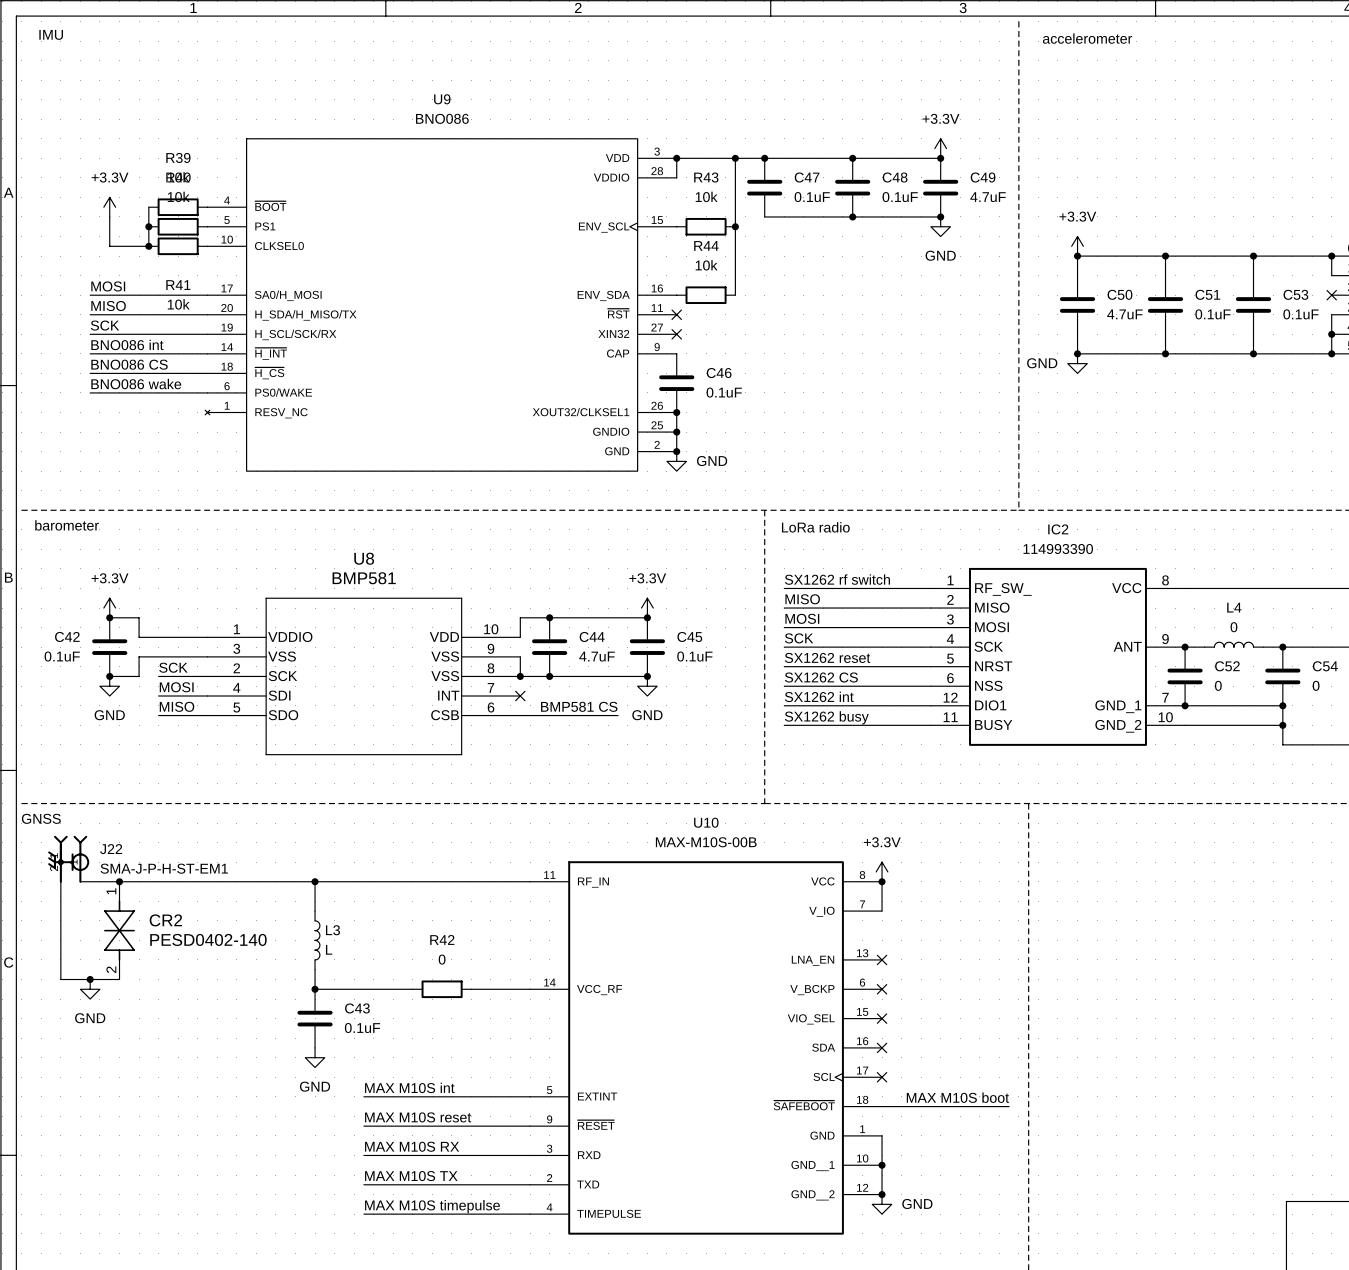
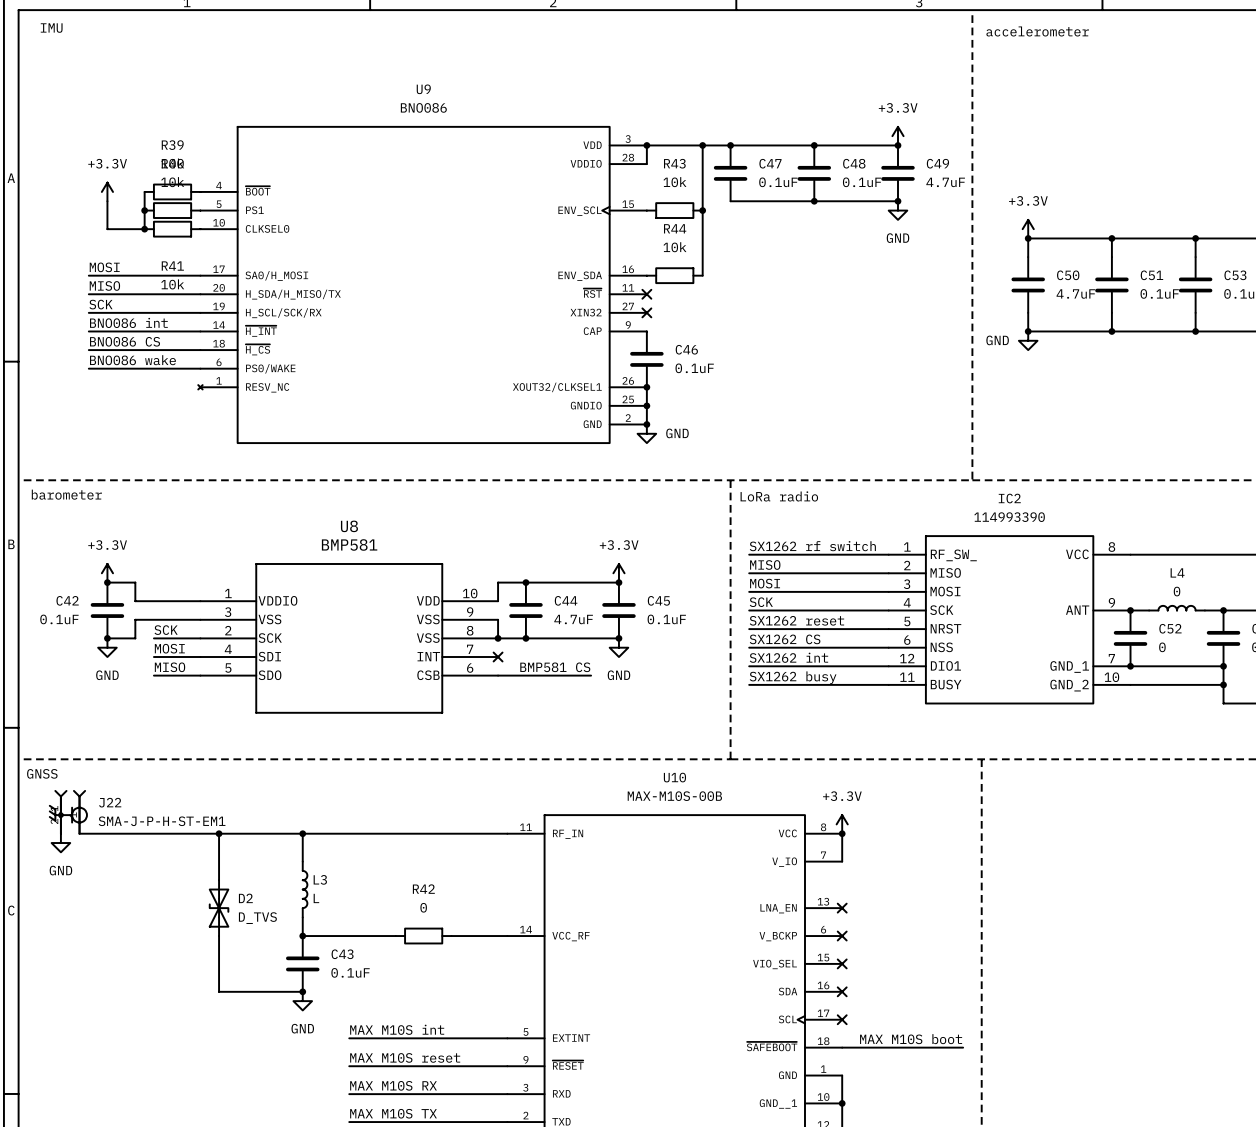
wire: (60, 881) (60, 979) (119, 979) -> none
junction: (119, 881) -> none
wire: none -> (219, 833) (219, 880)
junction: none -> (219, 833)
CR2: PESD0402-140 (119, 930) -> none
D2: none -> D_TVS (219, 908)
junction: (90, 979) -> none
power symbol position: GND (90, 989) -> GND (60, 843)
wire: none -> (219, 936) (219, 991) (302, 991)
junction: none -> (302, 991)

